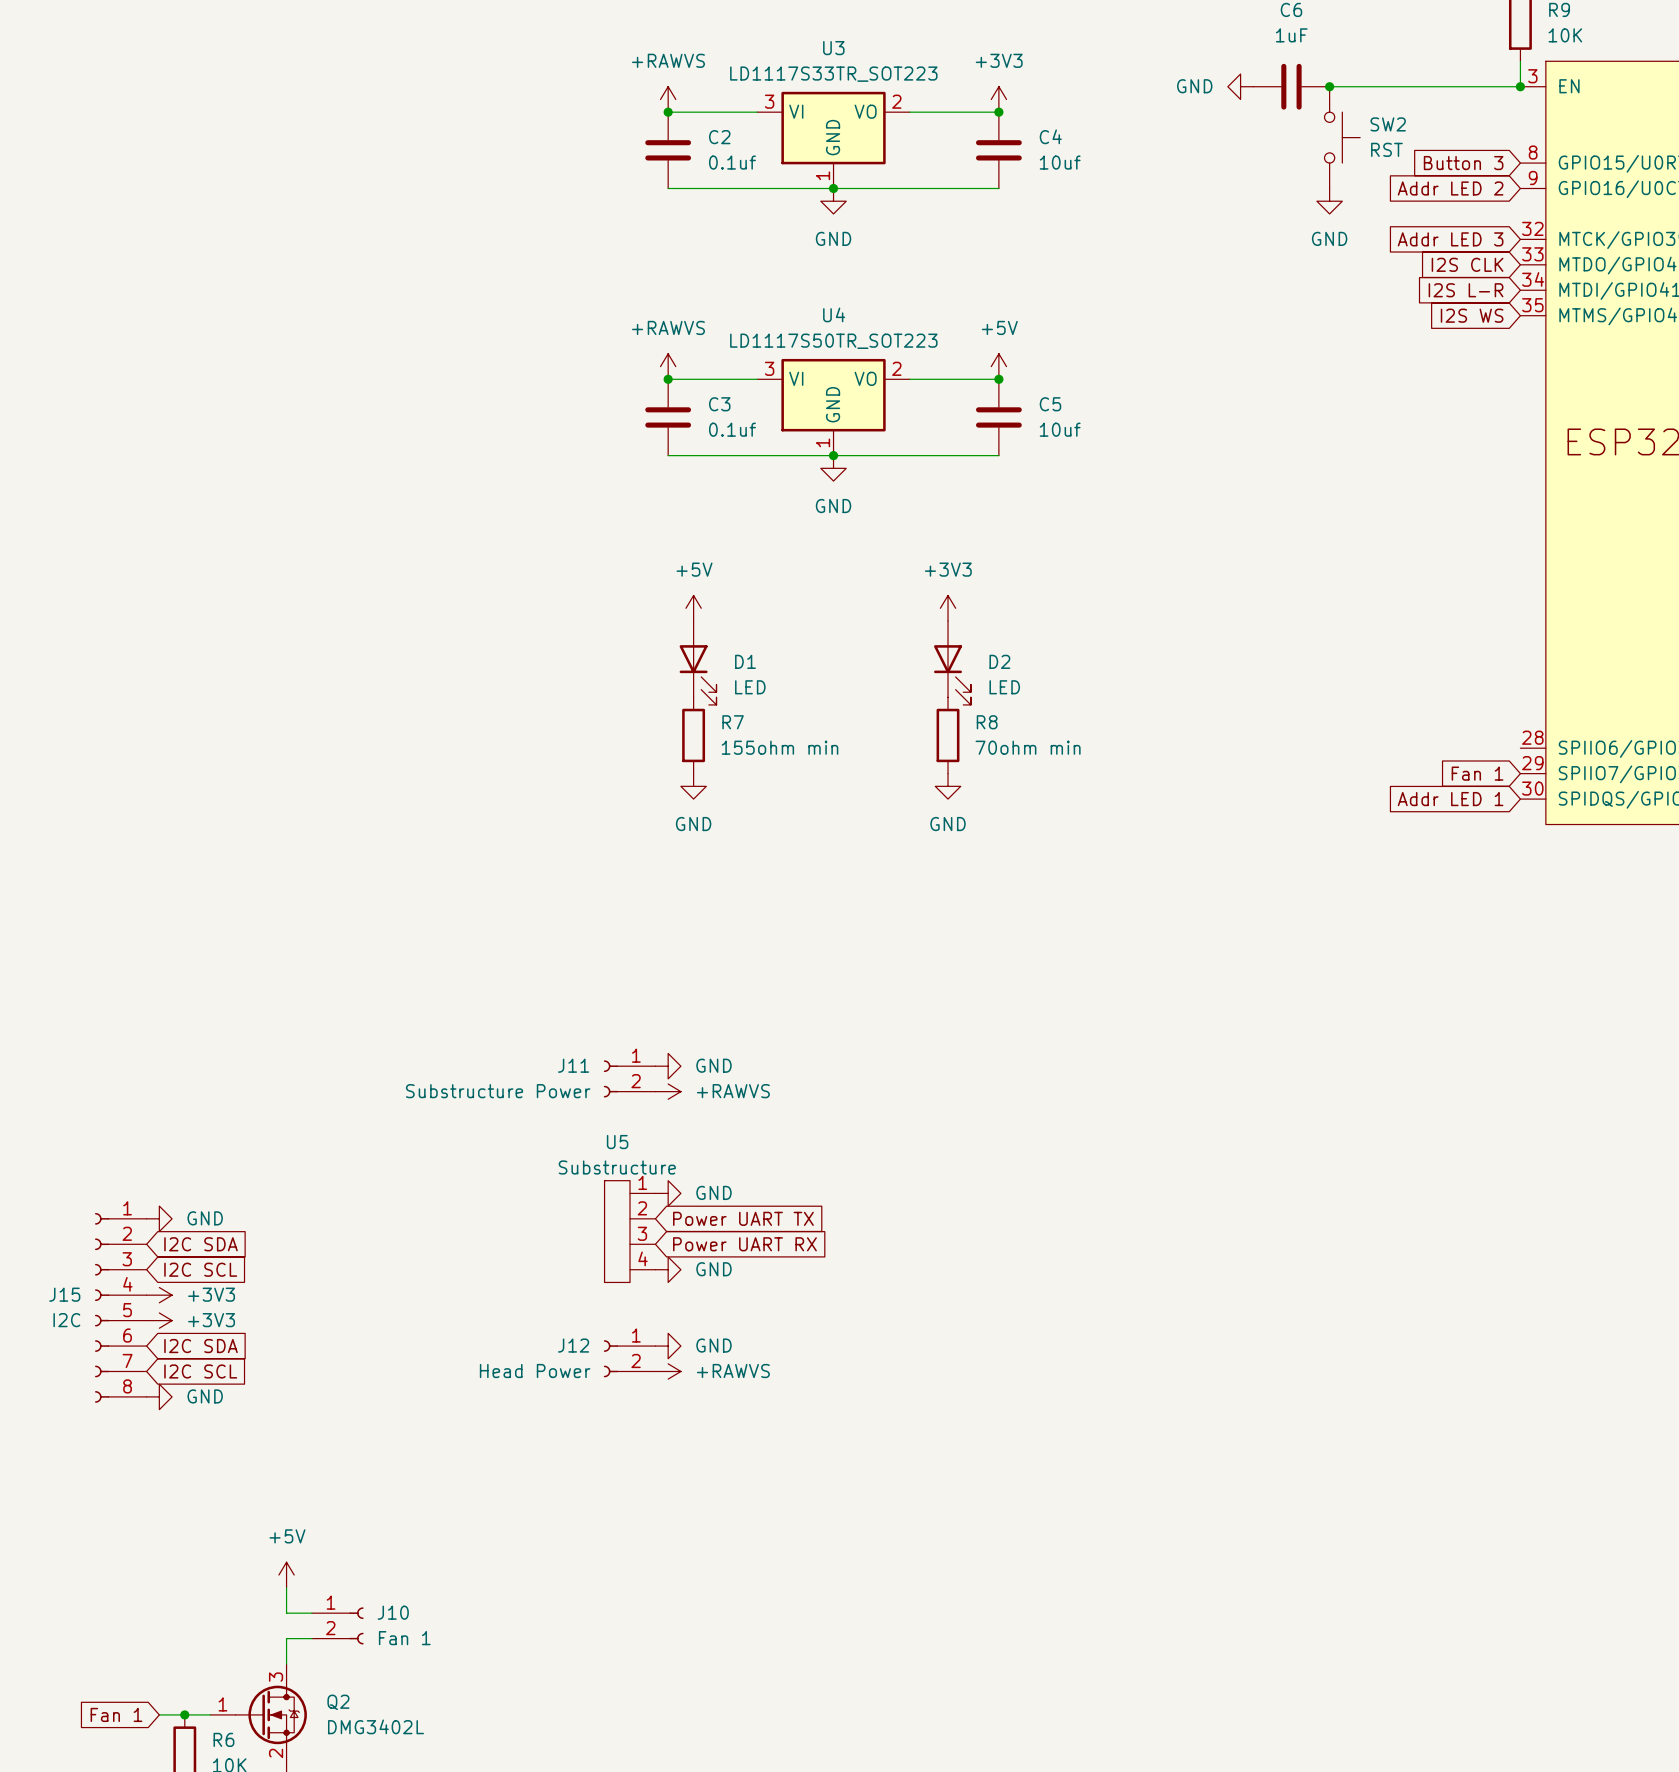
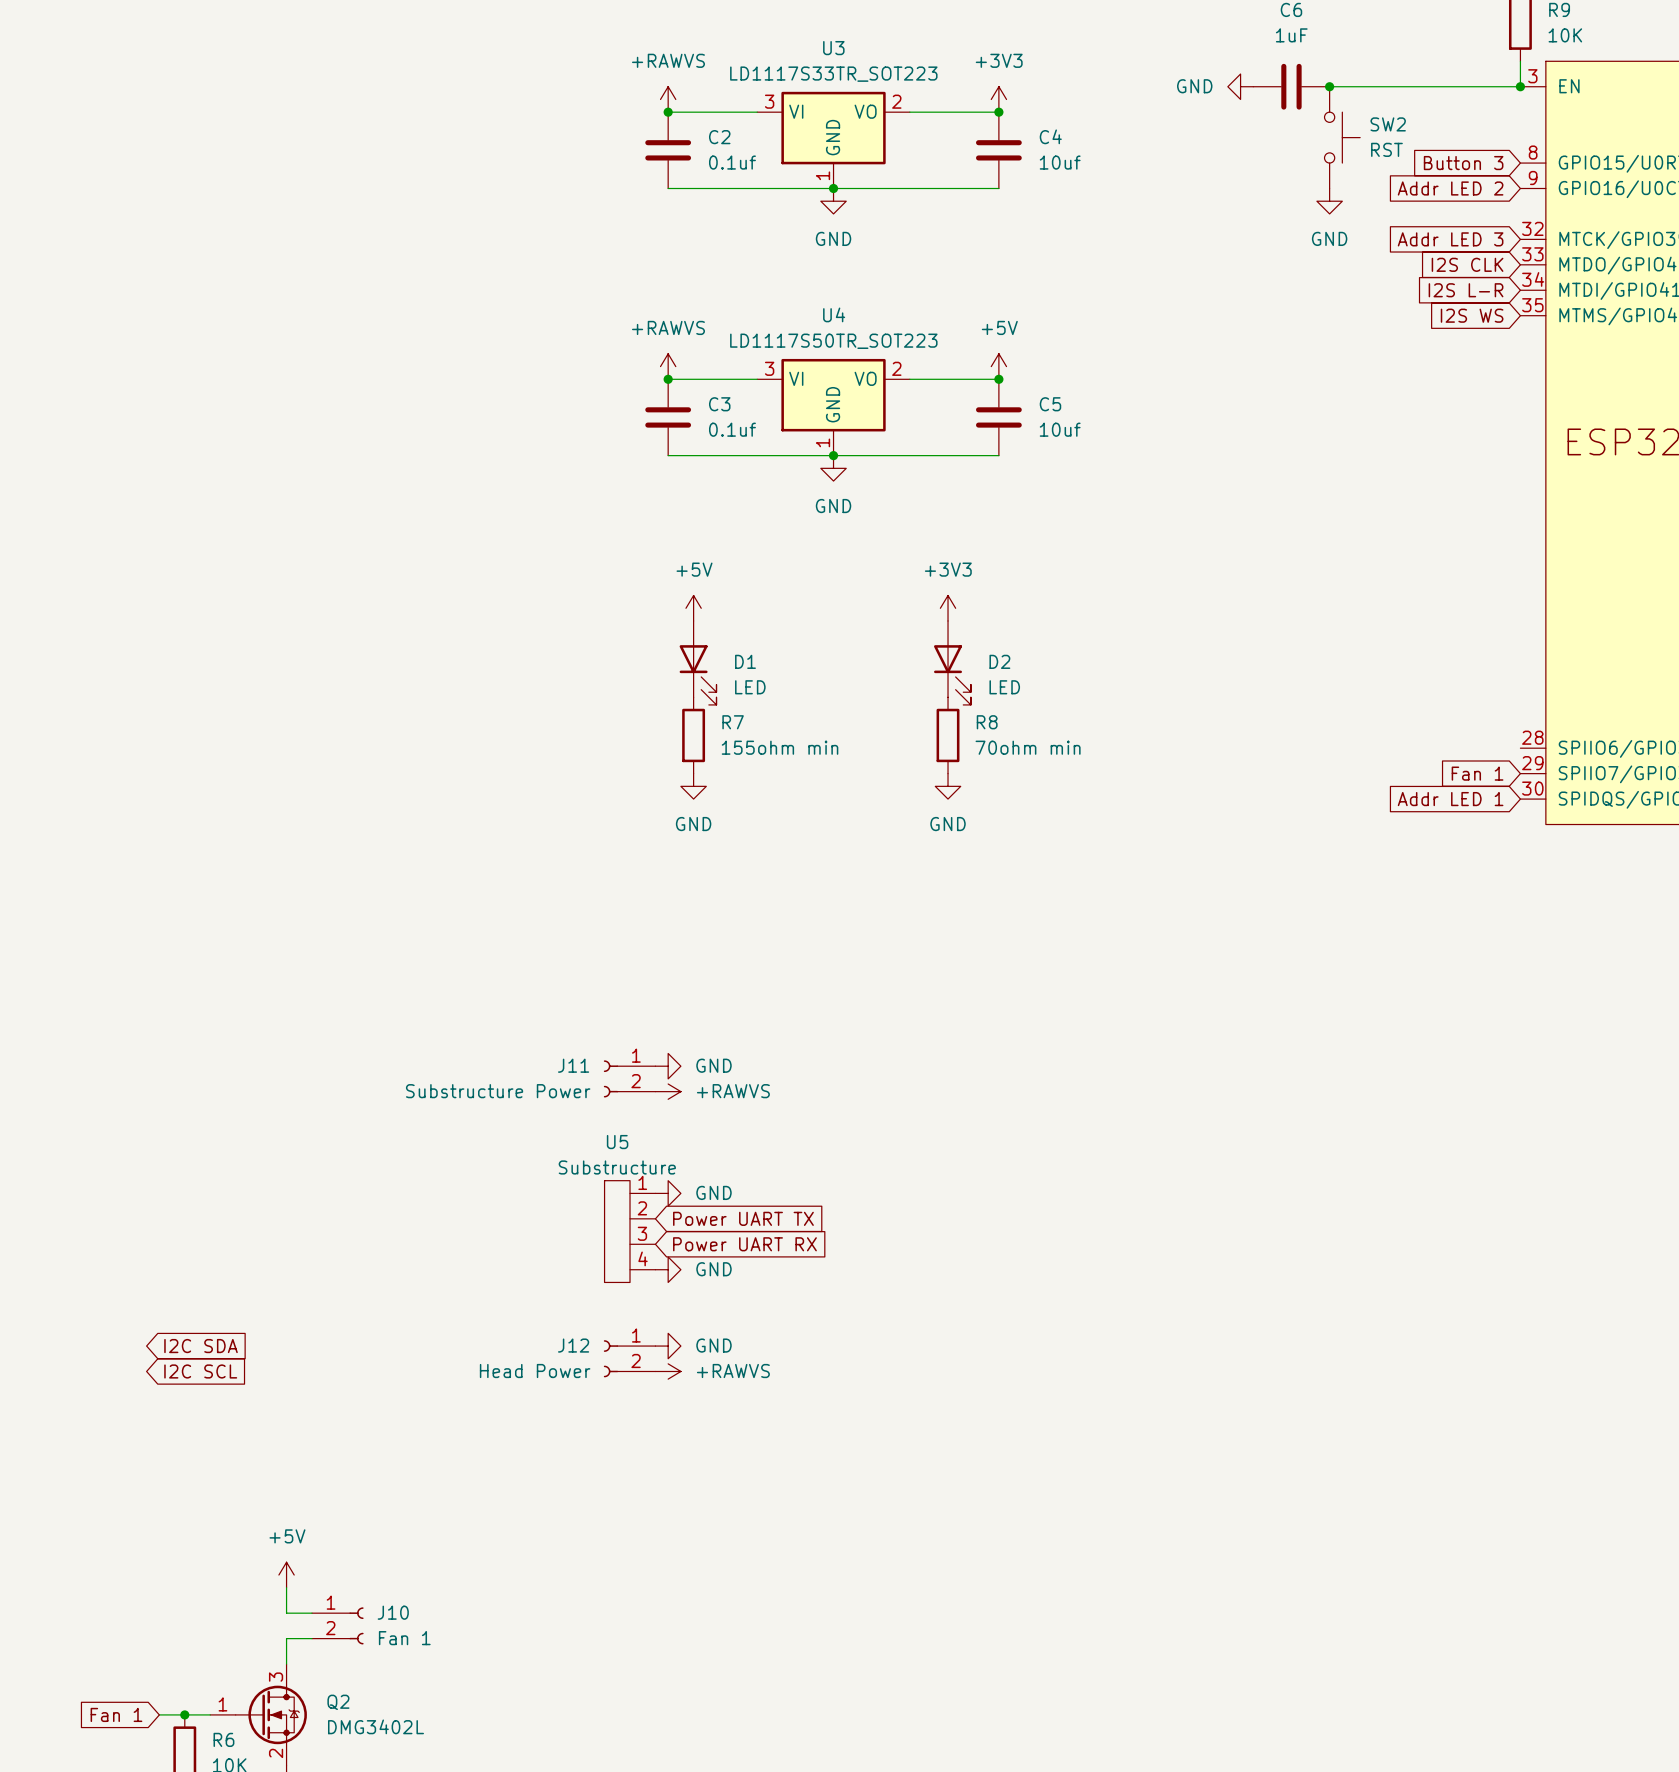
power symbol: GND (159, 1218) -> none
global label: I2C SDA (201, 1244) -> none
global label: I2C SCL (200, 1269) -> none
power symbol: +3V3 (159, 1295) -> none
J15: I2C (120, 1307) -> none
power symbol: +3V3 (159, 1320) -> none
power symbol: GND (159, 1396) -> none

